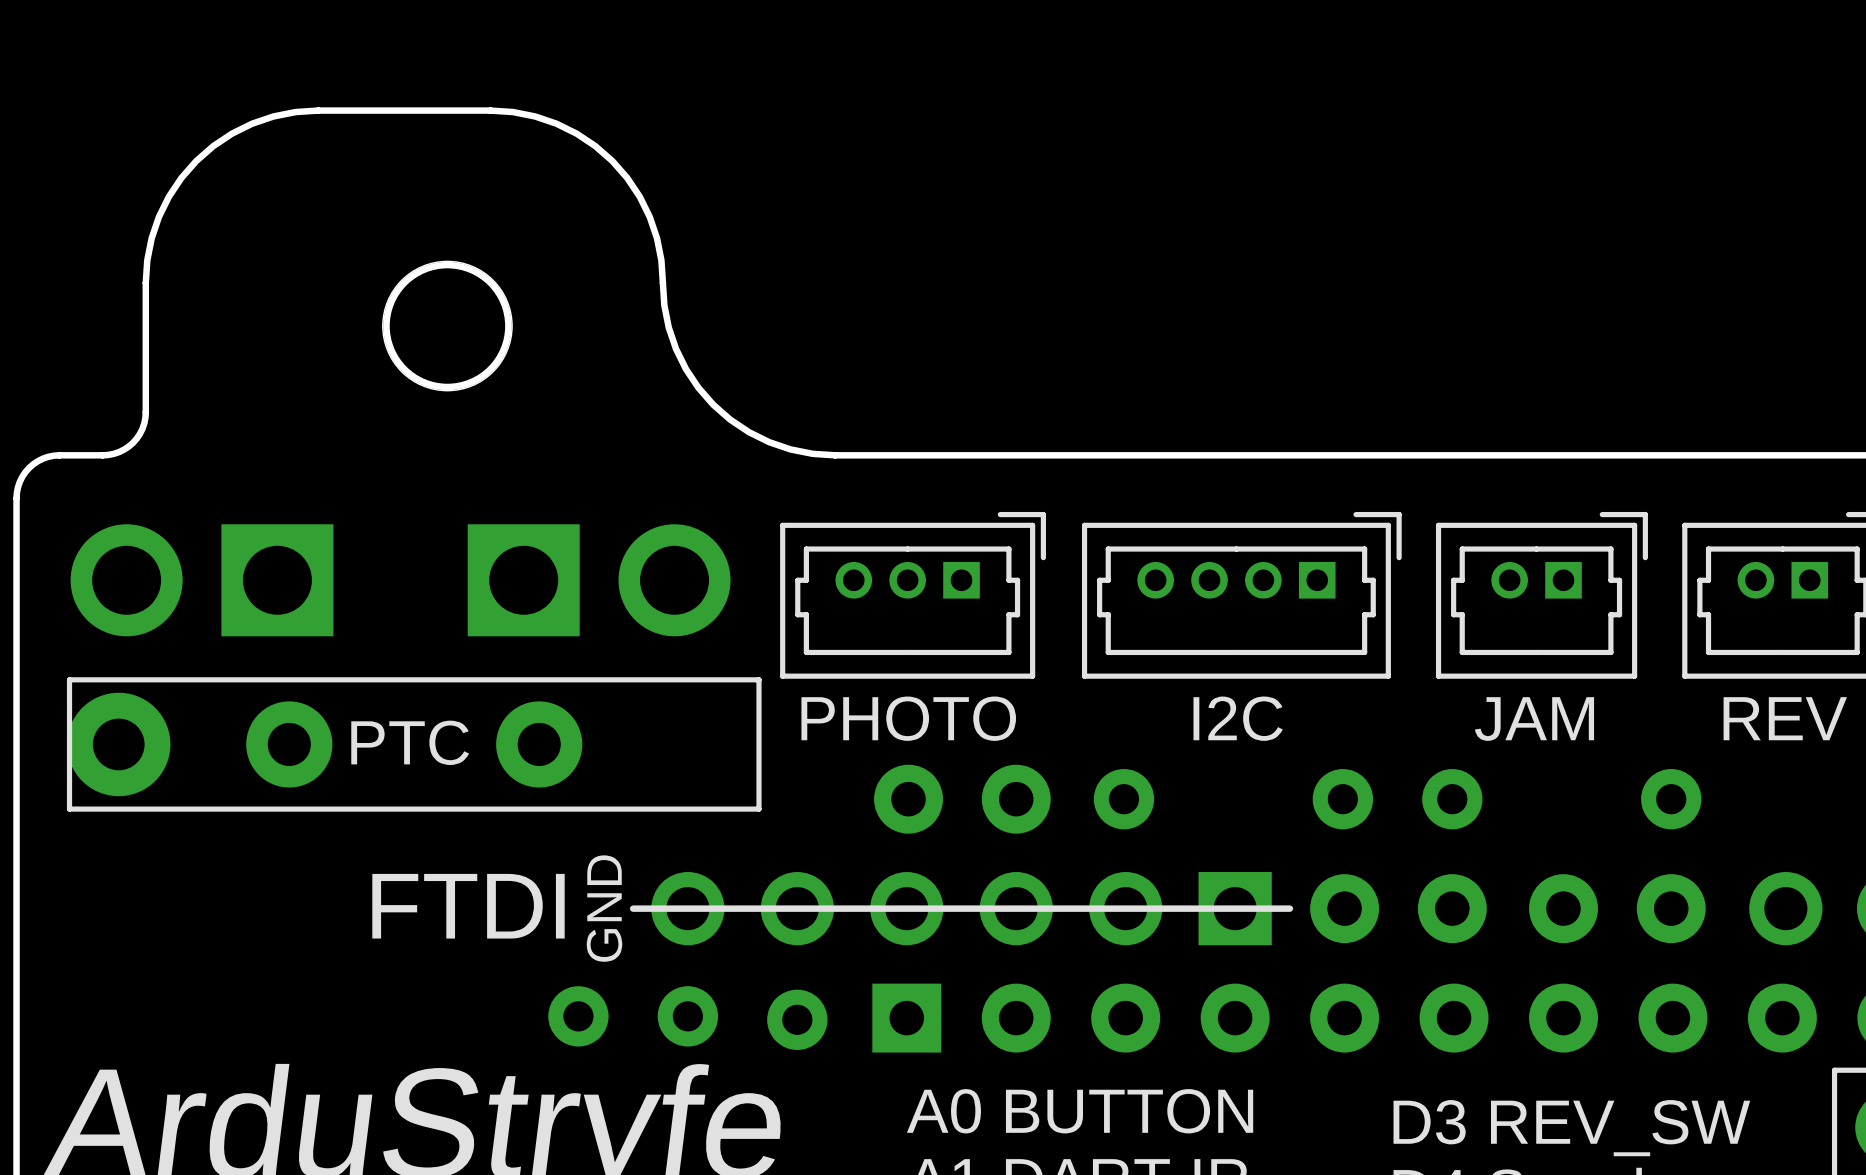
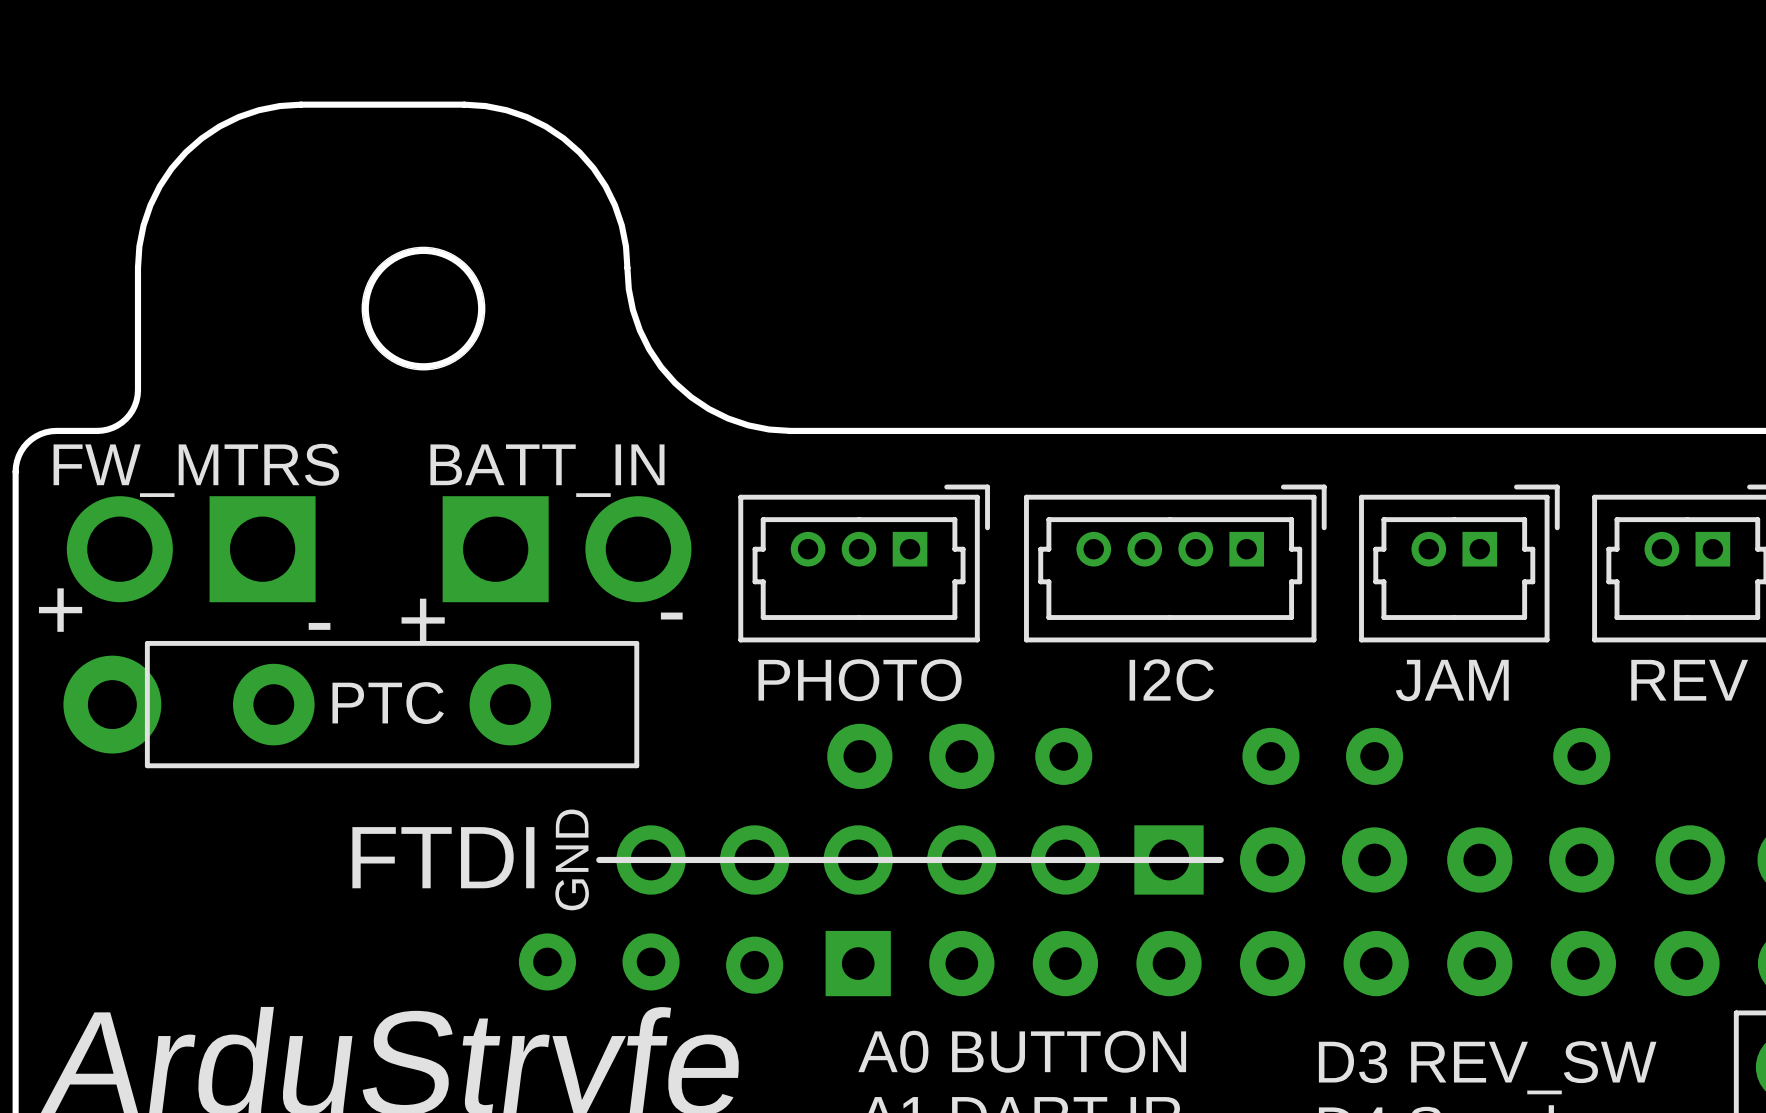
text: none -> FW_MTRS (196, 470)
text: none -> BATT_IN (547, 470)
text: none -> + (60, 610)
text: none -> - (671, 616)
text: none -> + (423, 620)
text: none -> - (319, 626)
part footprint: [66, 677, 762, 812] -> [144, 640, 640, 769]

